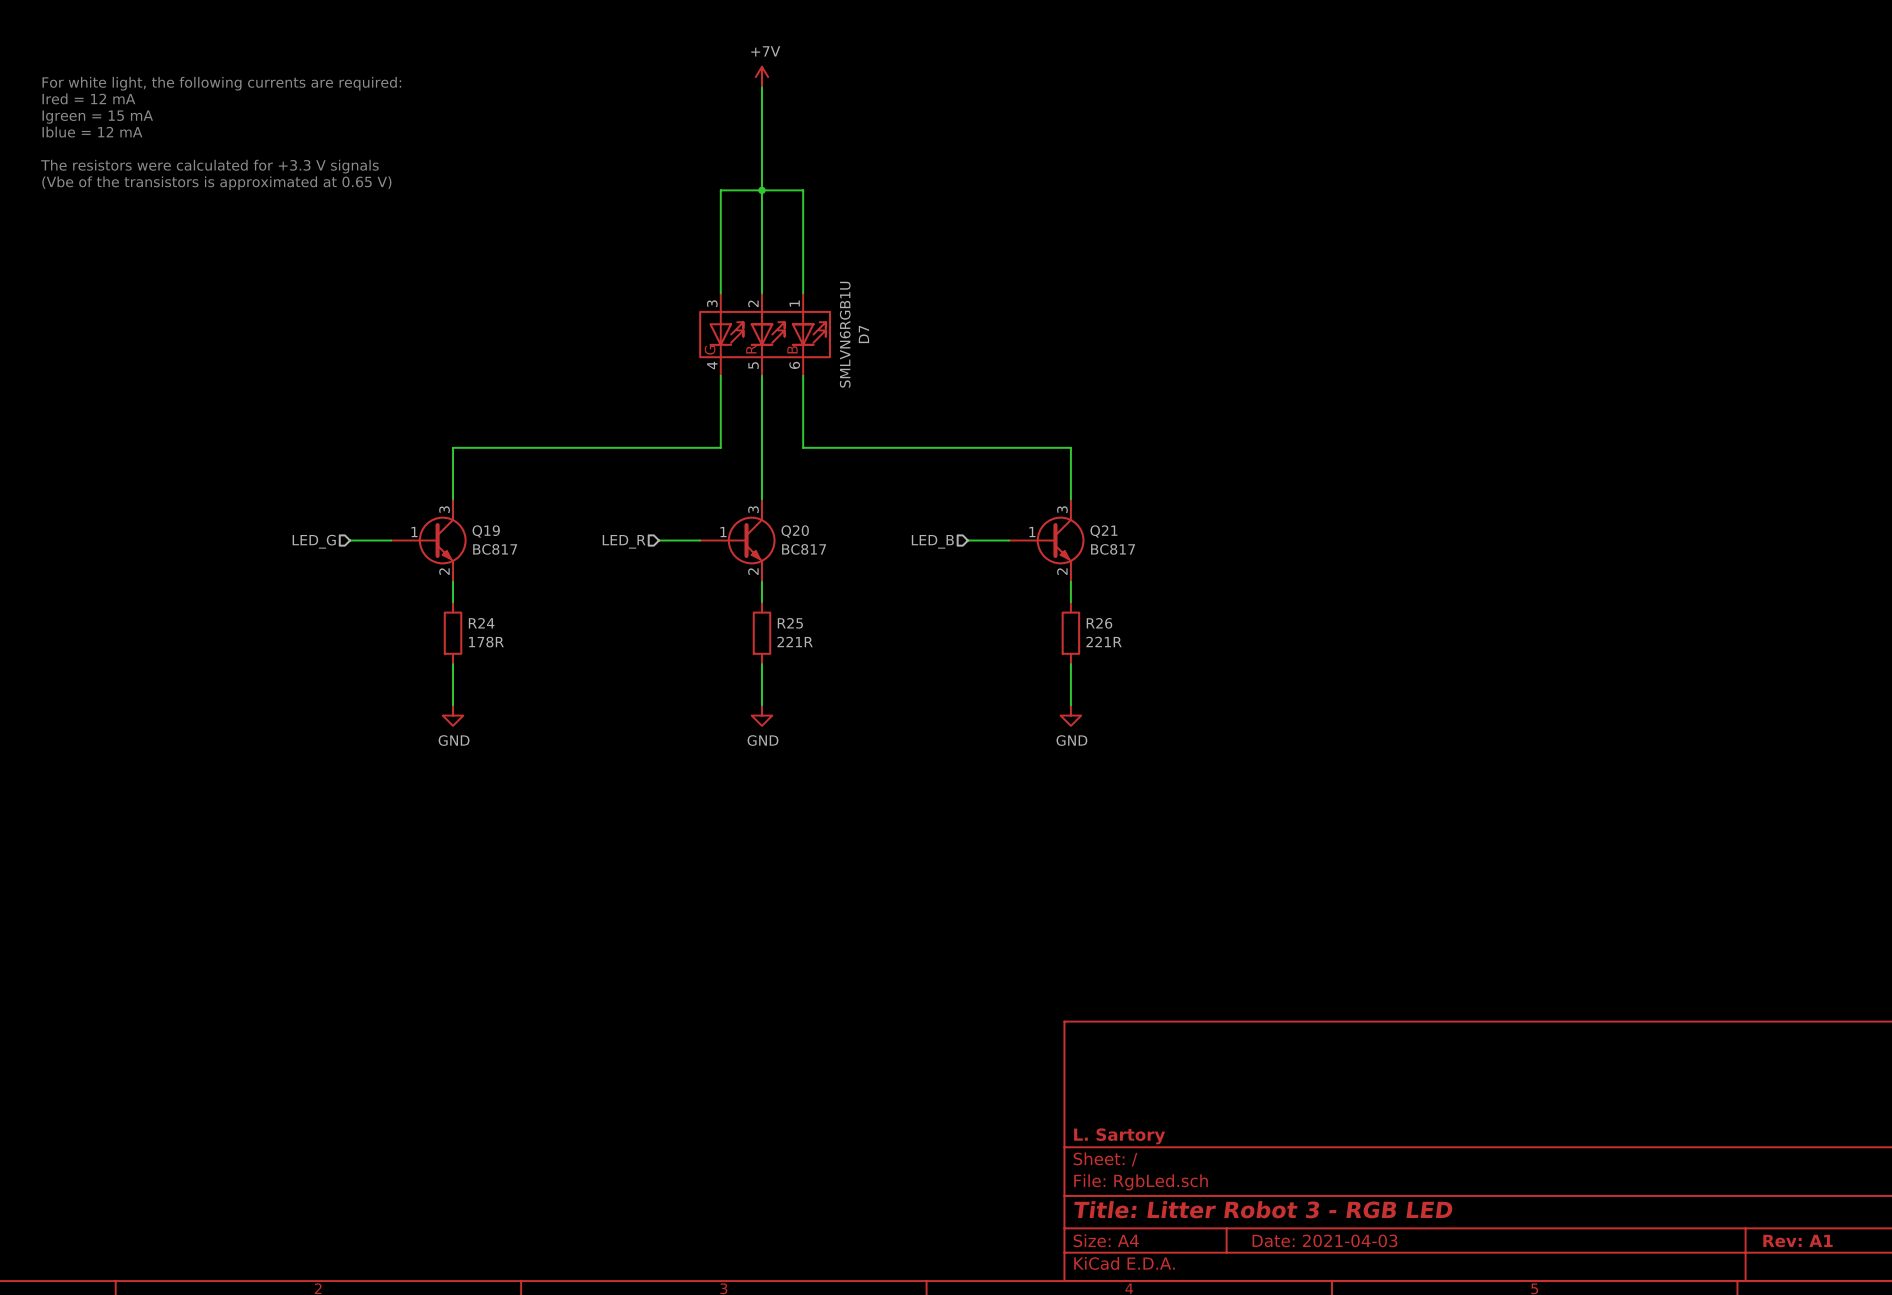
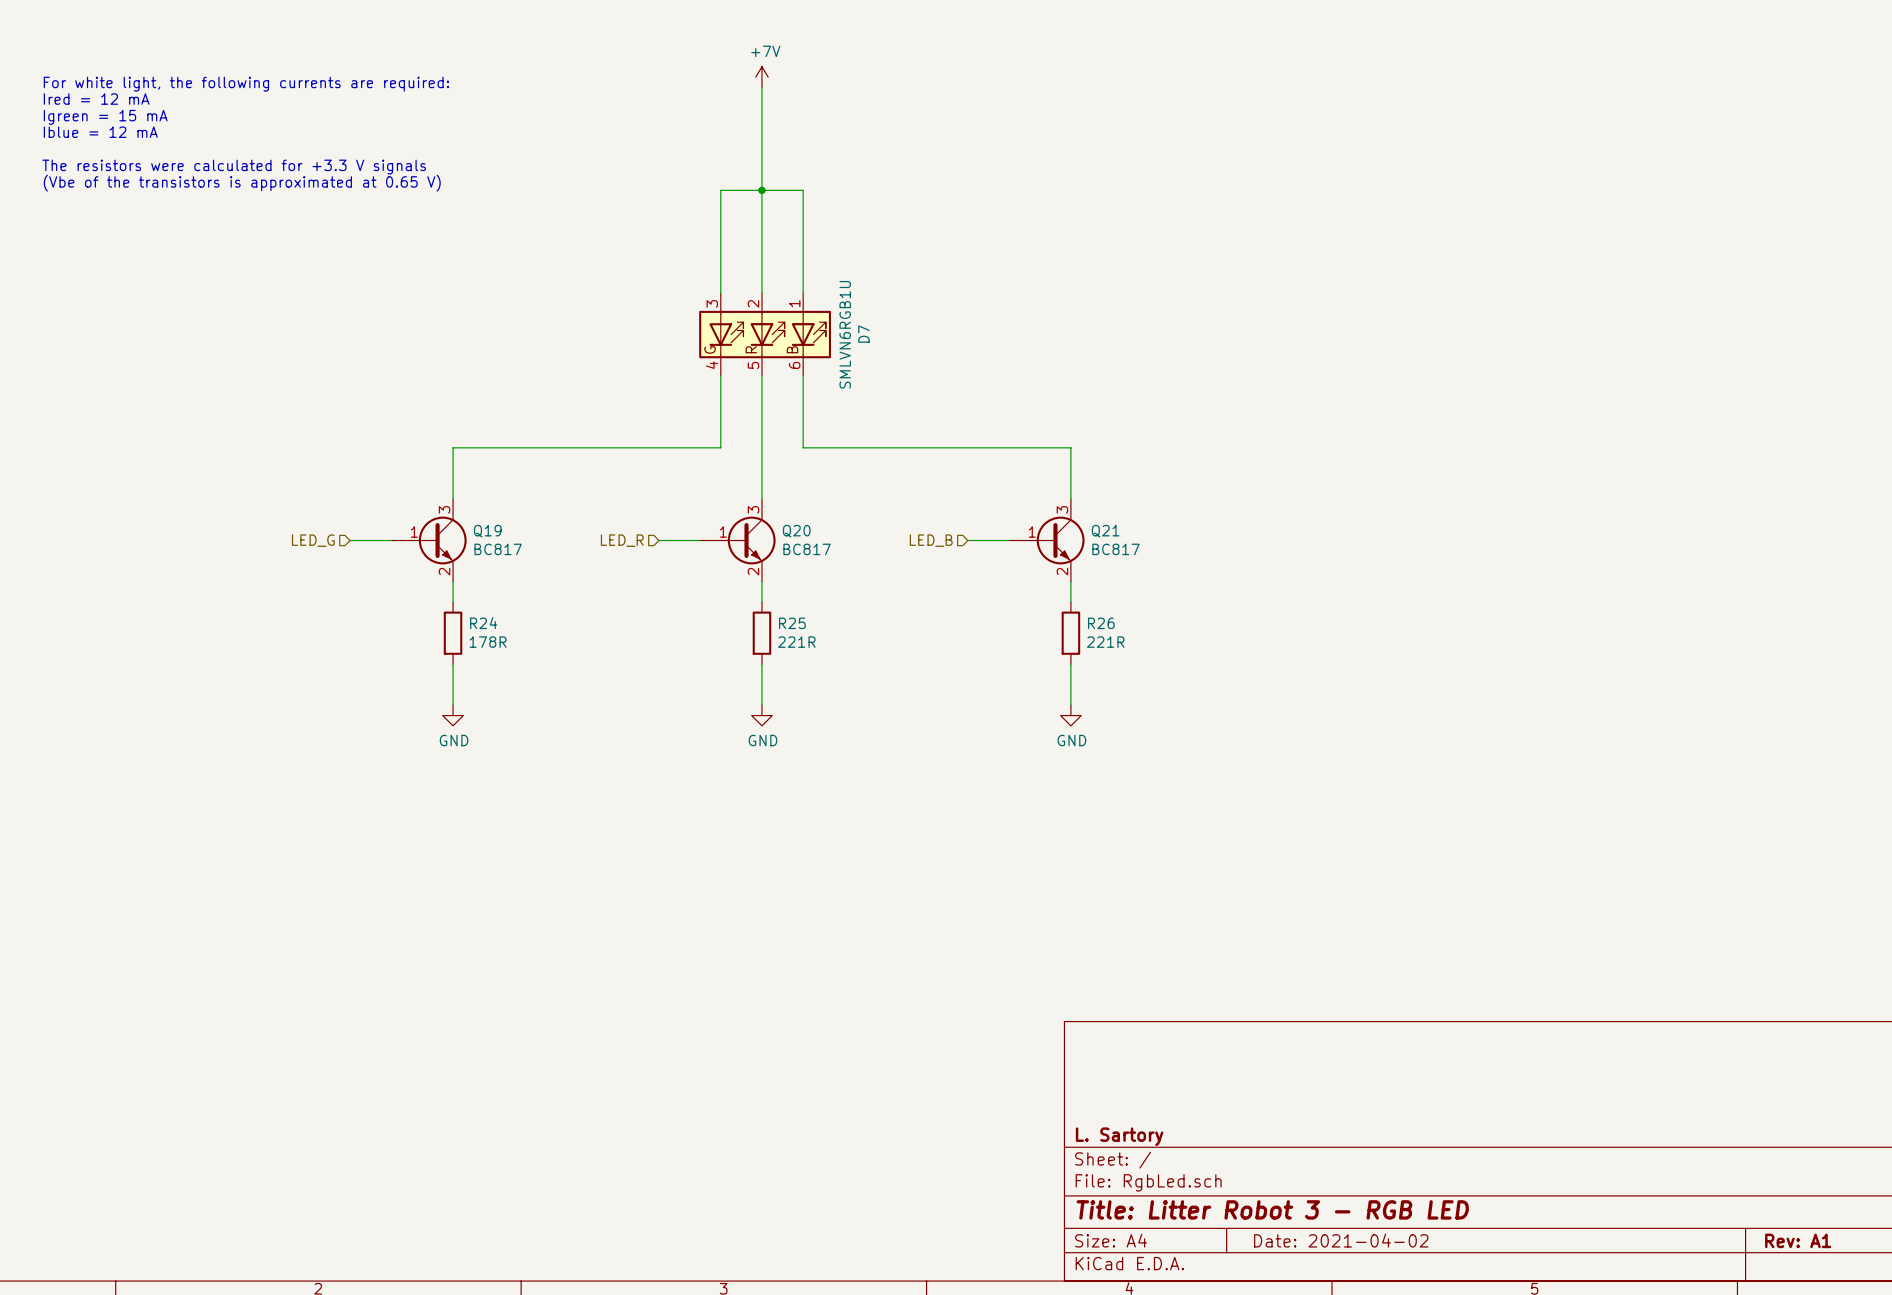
title block: Date: 2021-04-03 (1324, 1240) -> Date: 2021-04-02 (1341, 1240)

